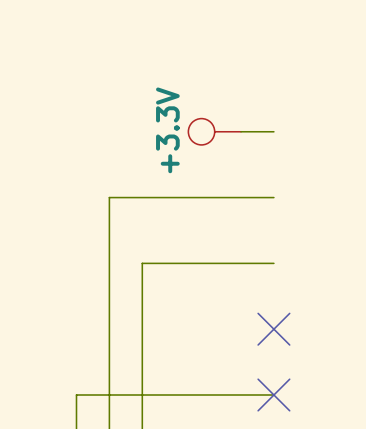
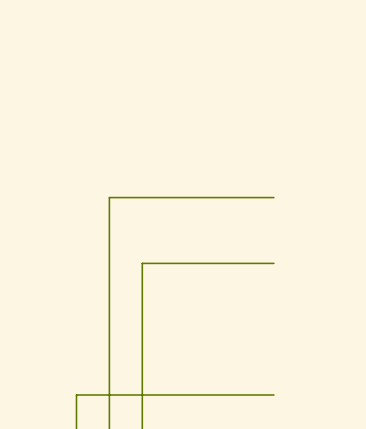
power symbol: +3.3V (214, 131) -> none
wire: (241, 131) (273, 131) -> none
no-connect mark: (273, 329) -> none
no-connect mark: (273, 395) -> none

